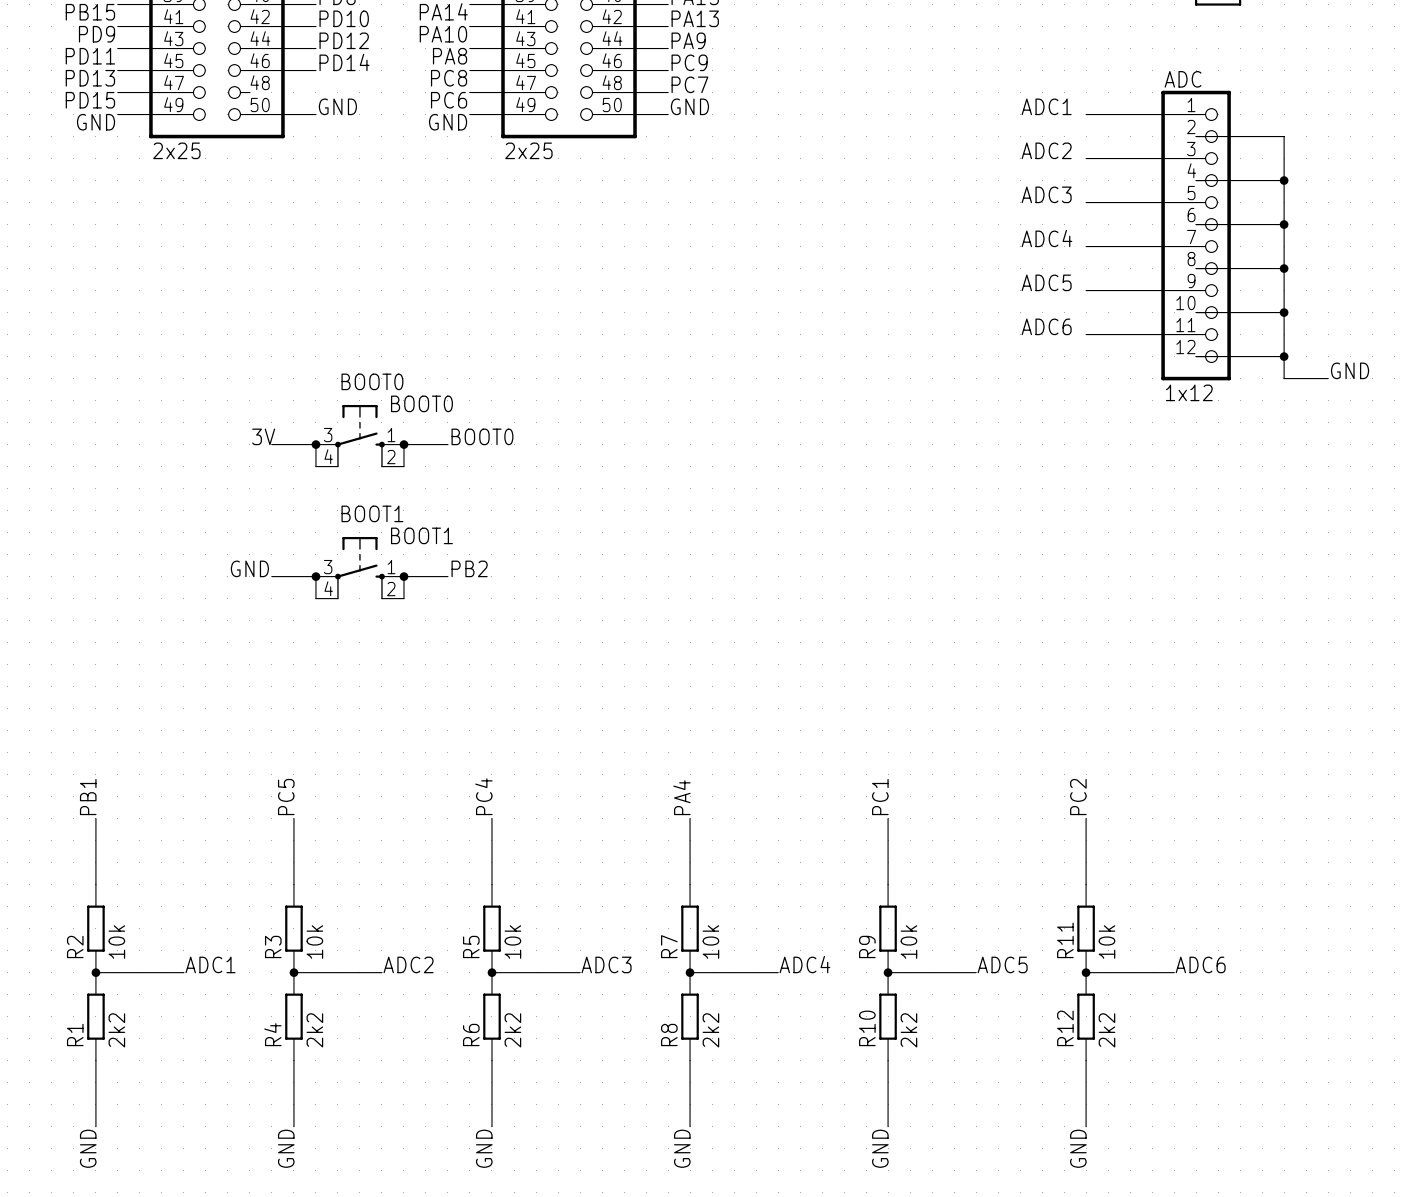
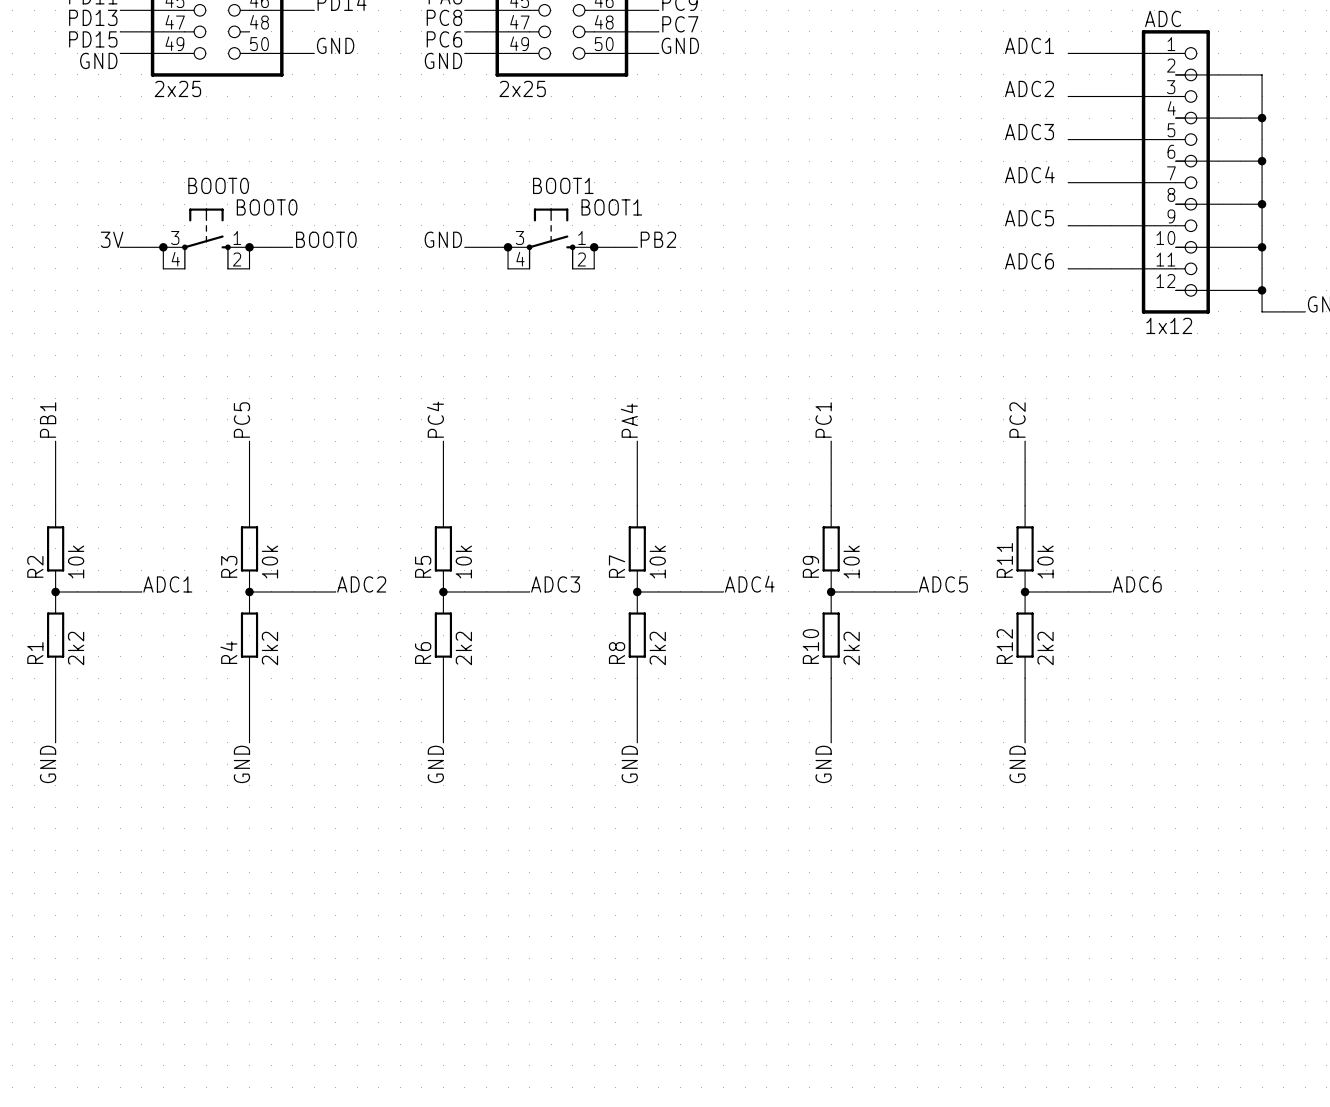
label: none -> GND (443, 239)
label: none -> PB2 (658, 239)
junction: none -> (163, 247)
junction: none -> (249, 247)
wire: none -> (464, 247) (508, 247) (508, 268)
junction: none -> (508, 247)
junction: none -> (594, 247)
wire: none -> (637, 247) (594, 247) (594, 268)
label position: 3V (263, 436) -> 3V (112, 239)
BOOT0 position: (359, 436) -> (206, 239)
label position: BOOT0 (482, 436) -> BOOT0 (326, 239)
wire: (271, 444) (315, 444) (315, 466) -> (120, 247) (163, 247) (163, 268)
junction: (315, 444) -> none
junction: (403, 444) -> none
wire: (447, 444) (403, 444) (403, 466) -> (292, 247) (249, 247) (249, 268)
label: none -> PB1 (48, 420)
label: none -> PC5 (241, 420)
label: none -> PC4 (435, 419)
label: none -> PC1 (823, 420)
label: none -> PC2 (1017, 420)
label: none -> PA4 (629, 420)
wire: none -> (55, 441) (55, 505)
wire: none -> (249, 441) (249, 505)
wire: none -> (637, 441) (637, 505)
wire: none -> (831, 441) (831, 505)
wire: none -> (1025, 441) (1025, 505)
label: GND (249, 568) -> none
BOOT1 position: (359, 568) -> (551, 239)
label: PB2 (469, 568) -> none
wire: (271, 576) (315, 576) (315, 598) -> none
junction: (315, 576) -> none
junction: (403, 576) -> none
wire: (447, 576) (403, 576) (403, 598) -> (443, 505) (443, 441)
label: none -> ADC1 (167, 584)
label: none -> ADC2 (361, 584)
label: none -> ADC3 (555, 584)
label: none -> ADC4 (749, 584)
label: none -> ADC5 (943, 584)
label: none -> ADC6 (1137, 584)
wire: none -> (55, 591) (141, 591)
junction: none -> (55, 591)
wire: none -> (249, 591) (335, 591)
junction: none -> (249, 591)
wire: none -> (443, 591) (529, 591)
junction: none -> (443, 591)
wire: none -> (637, 591) (723, 591)
junction: none -> (637, 591)
wire: none -> (831, 591) (917, 591)
junction: none -> (831, 591)
wire: none -> (1025, 591) (1111, 591)
junction: none -> (1025, 591)
label: PC4 (483, 796) -> none
label: PB1 (88, 797) -> none
label: PC5 (286, 797) -> none
label: PA4 (681, 797) -> none
label: PC1 (880, 797) -> none
label: PC2 (1078, 797) -> none
wire: (95, 818) (95, 884) -> (55, 678) (55, 742)
wire: (293, 818) (293, 884) -> (249, 678) (249, 742)
wire: (491, 818) (491, 884) -> (443, 678) (443, 742)
wire: (690, 818) (690, 884) -> (637, 678) (637, 742)
wire: (888, 818) (888, 884) -> (831, 678) (831, 742)
wire: (1086, 818) (1086, 884) -> (1025, 678) (1025, 742)
label: none -> GND (48, 764)
label: none -> GND (241, 764)
label: none -> GND (435, 764)
label: none -> GND (629, 764)
label: none -> GND (823, 764)
label: none -> GND (1017, 764)
R2 position: (95, 928) -> (55, 548)
R3 position: (293, 928) -> (249, 548)
R5 position: (491, 928) -> (443, 548)
R7 position: (690, 928) -> (637, 548)
R9 position: (888, 928) -> (831, 548)
R11 position: (1086, 928) -> (1025, 548)
label: ADC1 (210, 964) -> none
label: ADC2 (408, 964) -> none
label: ADC3 (606, 964) -> none
label: ADC4 (804, 964) -> none
label: ADC5 (1002, 964) -> none
label: ADC6 (1200, 964) -> none
wire: (95, 972) (183, 972) -> none
junction: (95, 972) -> none
wire: (293, 972) (381, 972) -> none
junction: (293, 972) -> none
wire: (491, 972) (580, 972) -> none
junction: (491, 972) -> none
wire: (690, 972) (778, 972) -> none
junction: (690, 972) -> none
wire: (888, 972) (976, 972) -> none
junction: (888, 972) -> none
wire: (1086, 972) (1174, 972) -> none
junction: (1086, 972) -> none
R1 position: (95, 1016) -> (55, 635)
R4 position: (293, 1016) -> (249, 635)
R6 position: (491, 1016) -> (443, 635)
R8 position: (690, 1016) -> (637, 635)
R10 position: (888, 1016) -> (831, 635)
R12 position: (1086, 1016) -> (1025, 635)
wire: (95, 1060) (95, 1126) -> none
wire: (293, 1060) (293, 1126) -> none
wire: (491, 1060) (491, 1126) -> none
wire: (690, 1060) (690, 1126) -> none
wire: (888, 1060) (888, 1126) -> none
wire: (1086, 1060) (1086, 1126) -> none
label: GND (88, 1148) -> none
label: GND (286, 1148) -> none
label: GND (484, 1148) -> none
label: GND (682, 1148) -> none
label: GND (880, 1148) -> none
label: GND (1078, 1148) -> none

